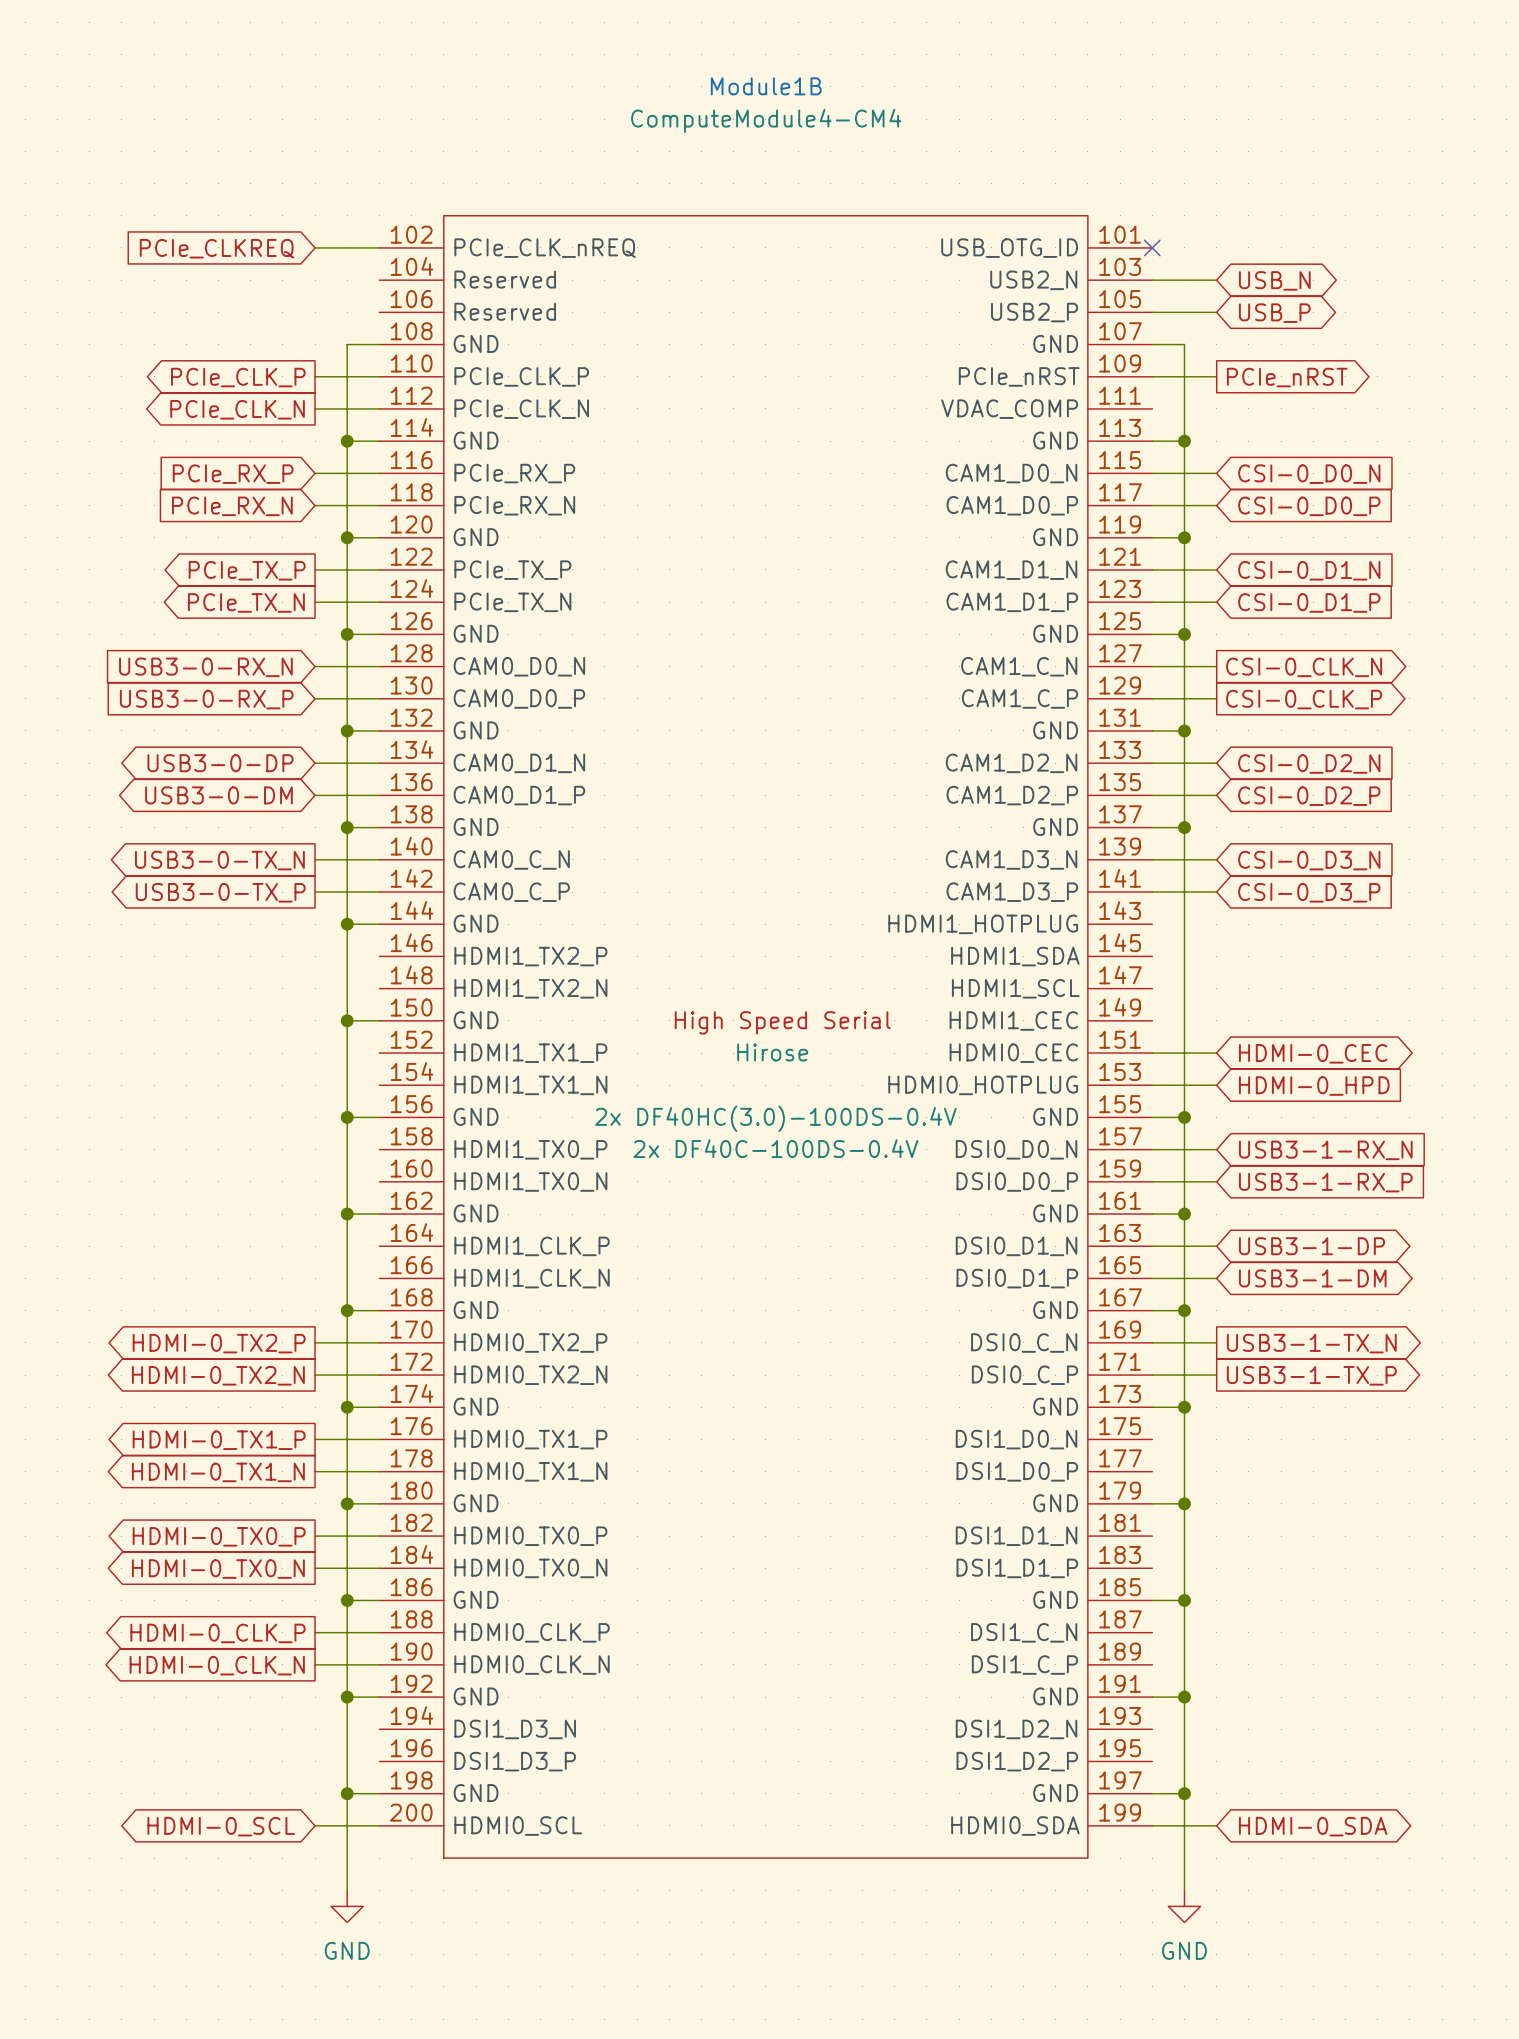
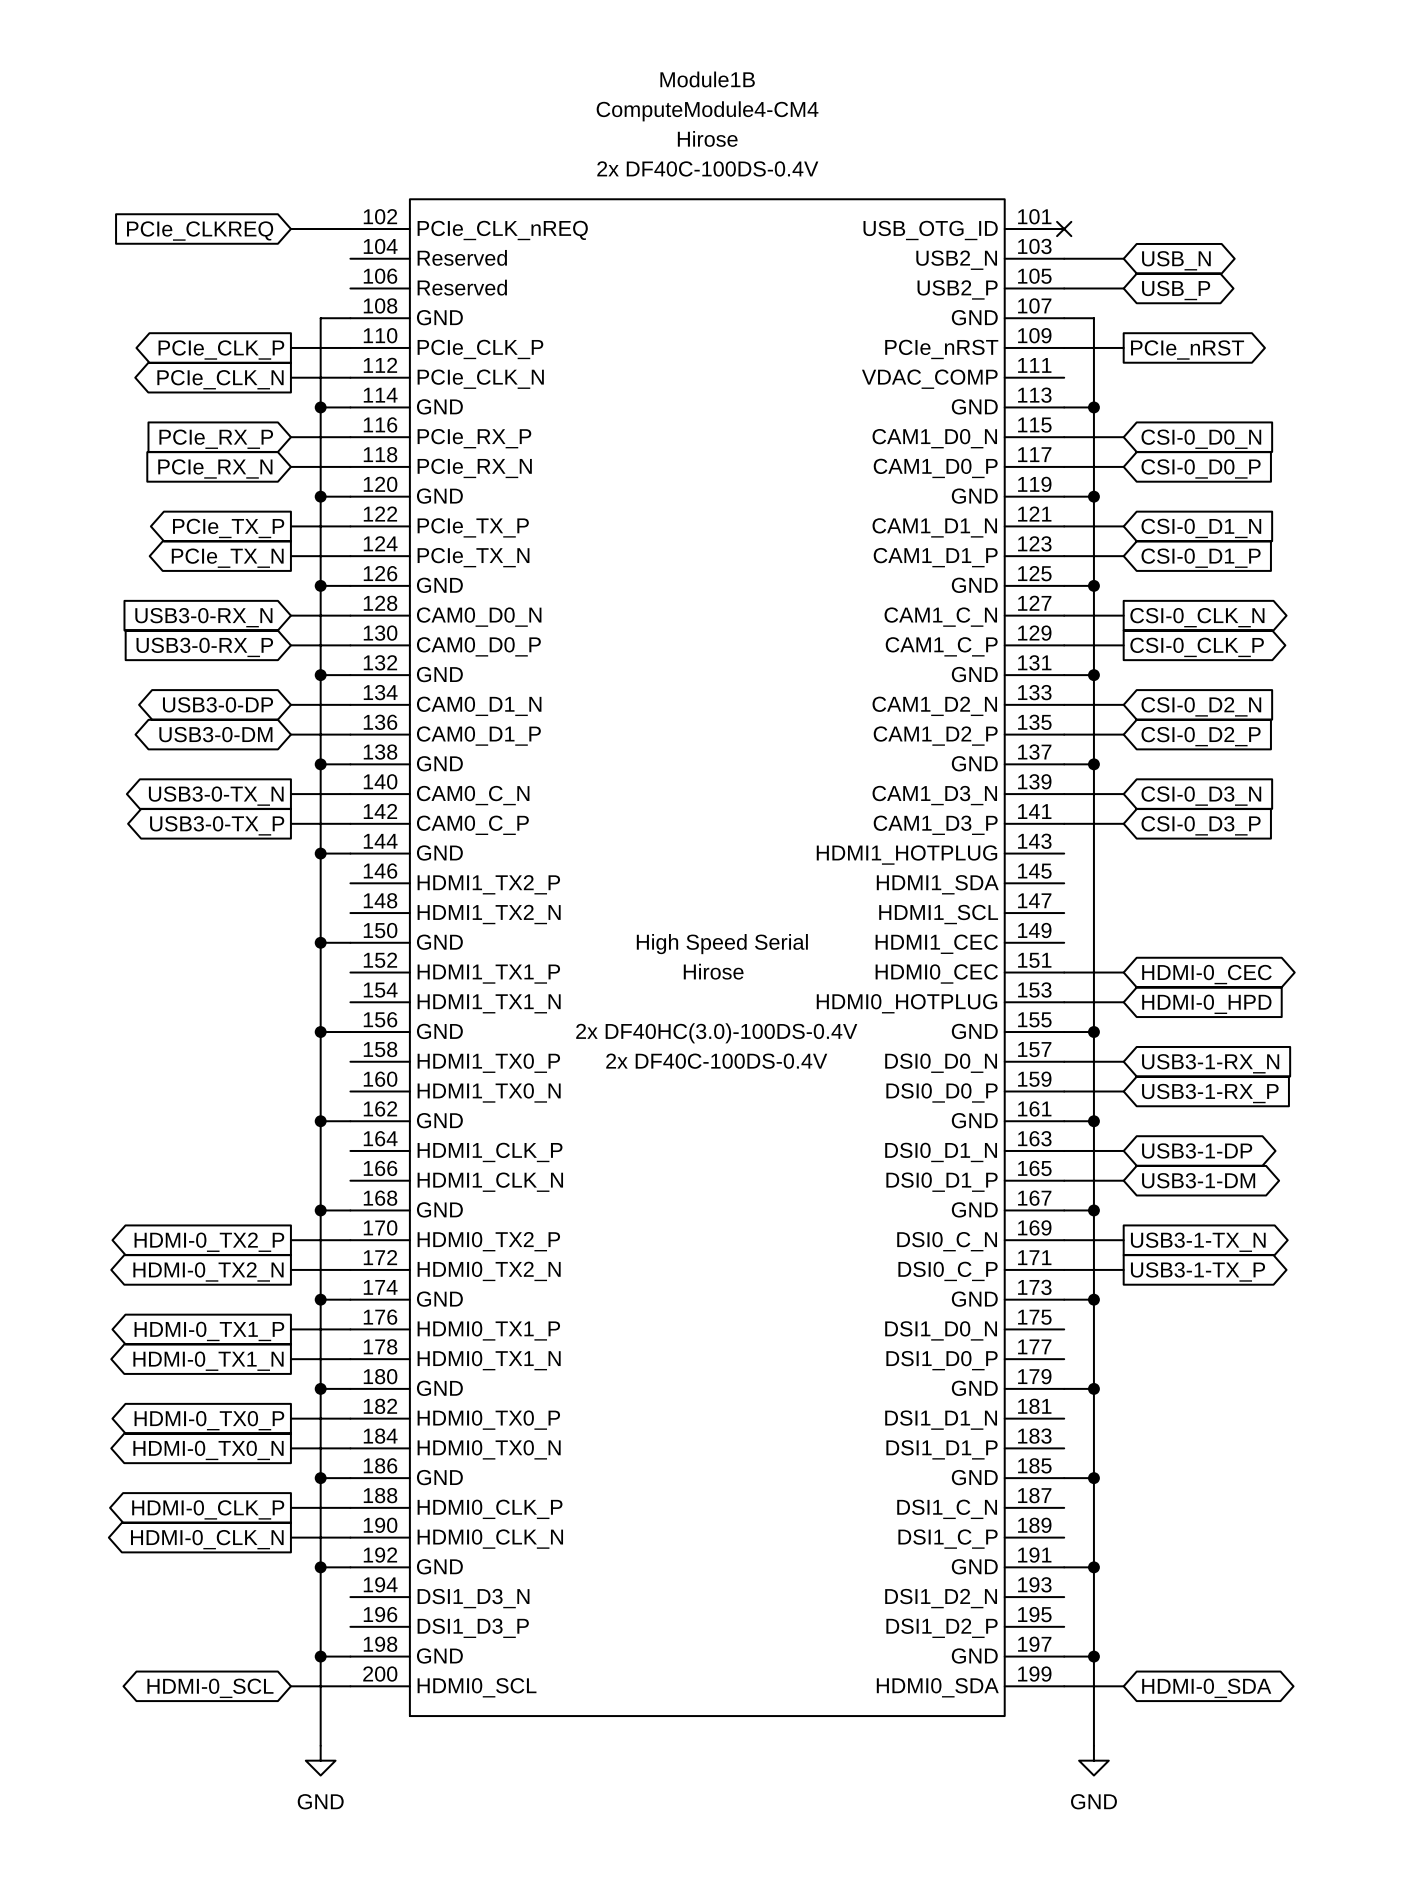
Module1B text: none -> Hirose (707, 138)
Module1B text: none -> 2x DF40C-100DS-0.4V (707, 168)

